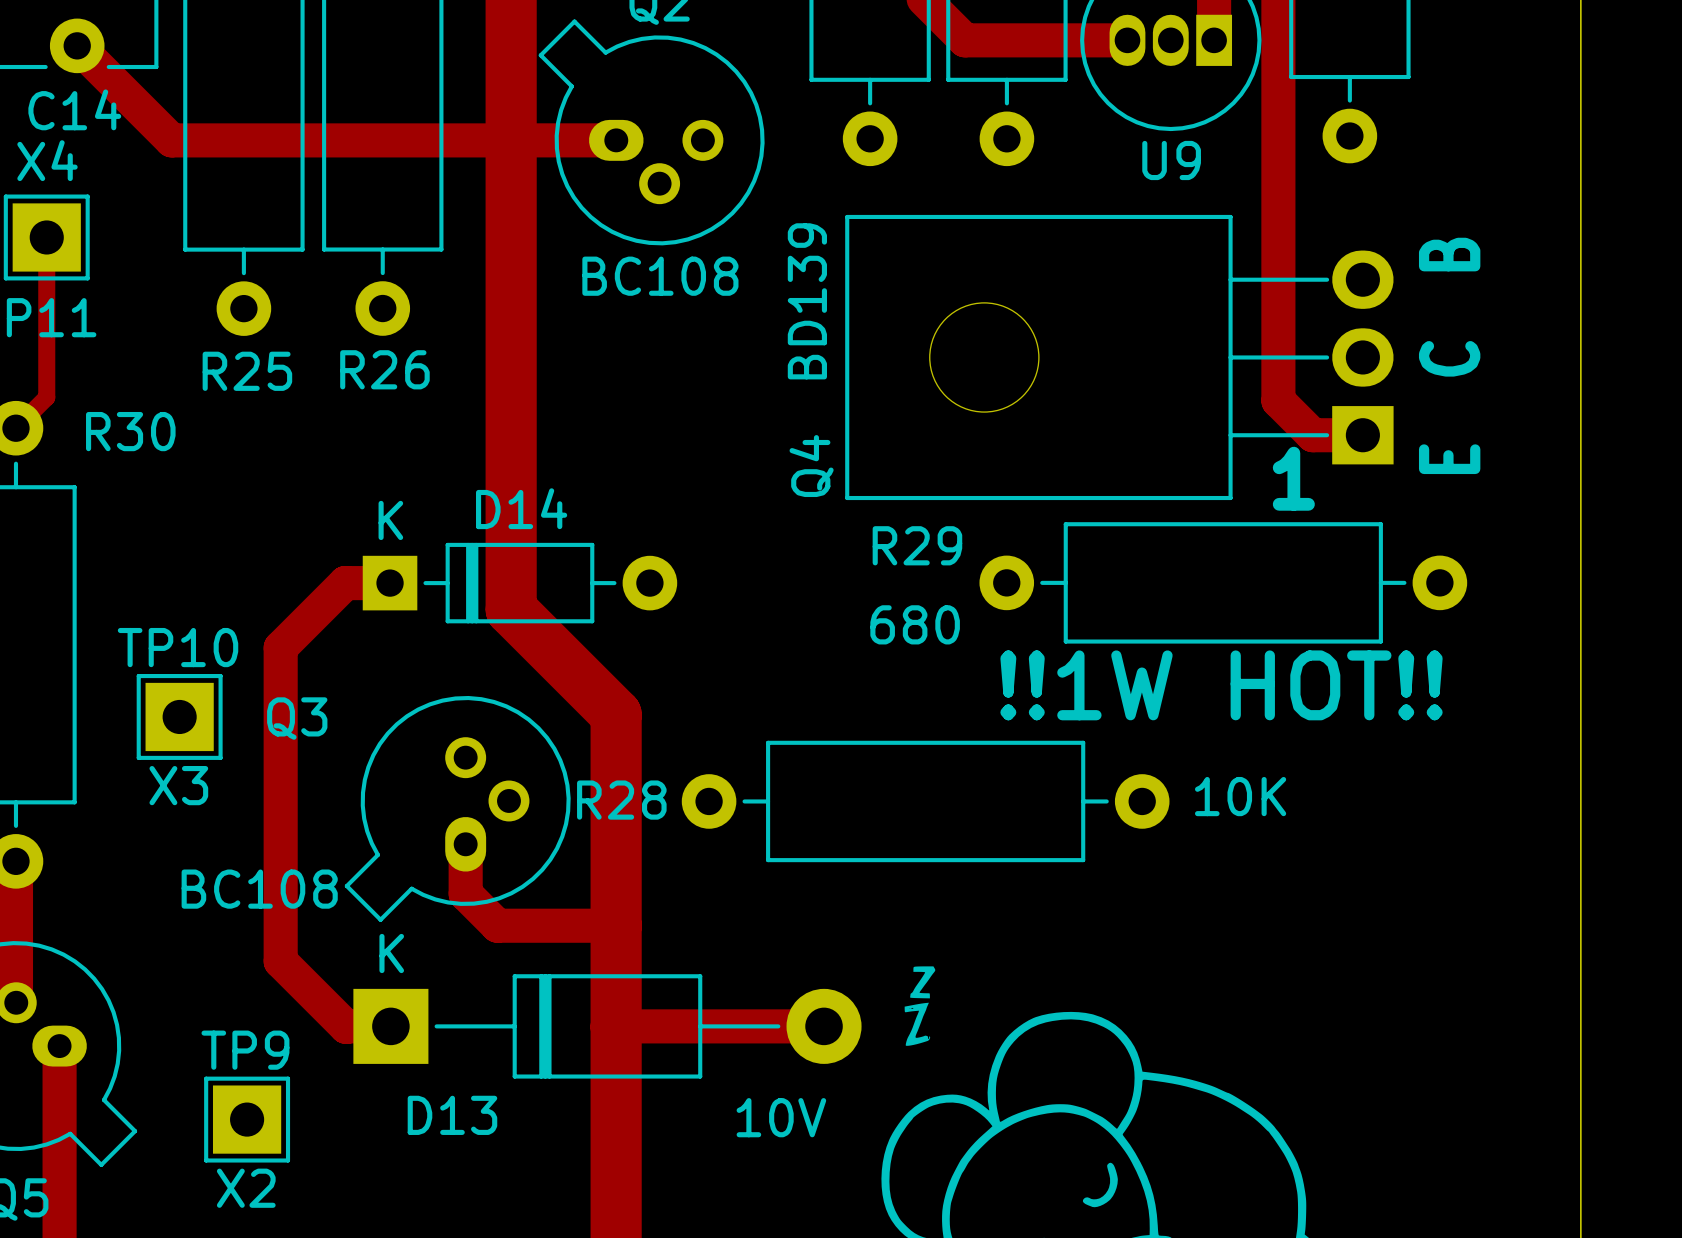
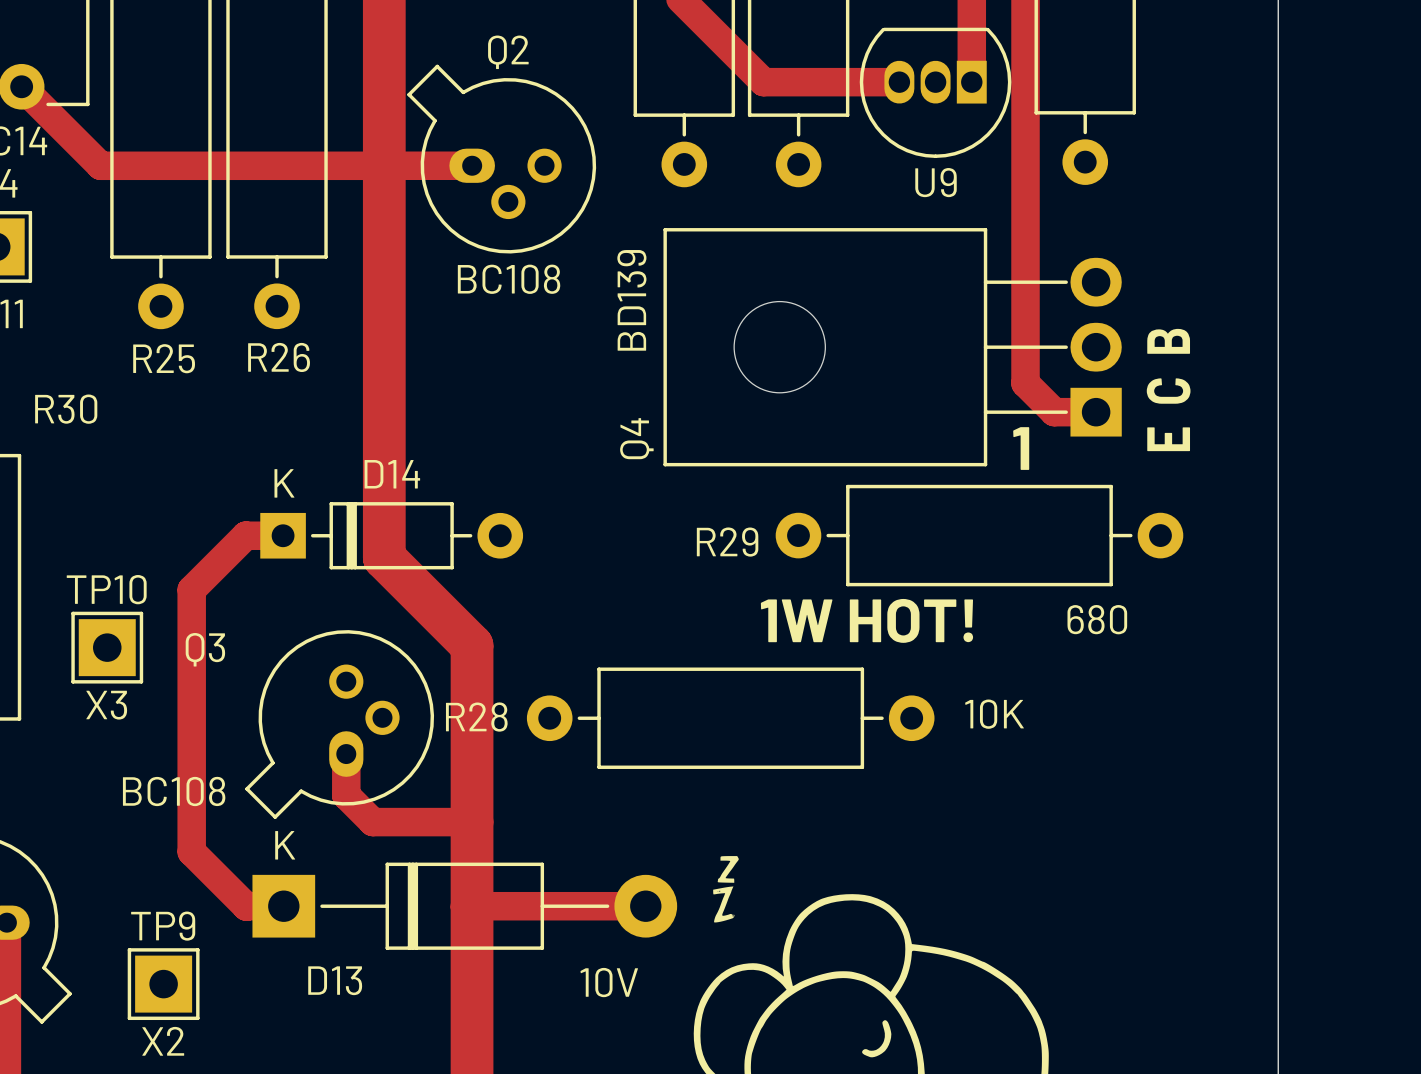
R29 name position: R29 (917, 545) -> R29 (727, 542)
R29 value position: 680 (915, 624) -> 680 (1097, 619)
text: !!1W HOT!! (1221, 685) -> 1W HOT! (866, 620)

